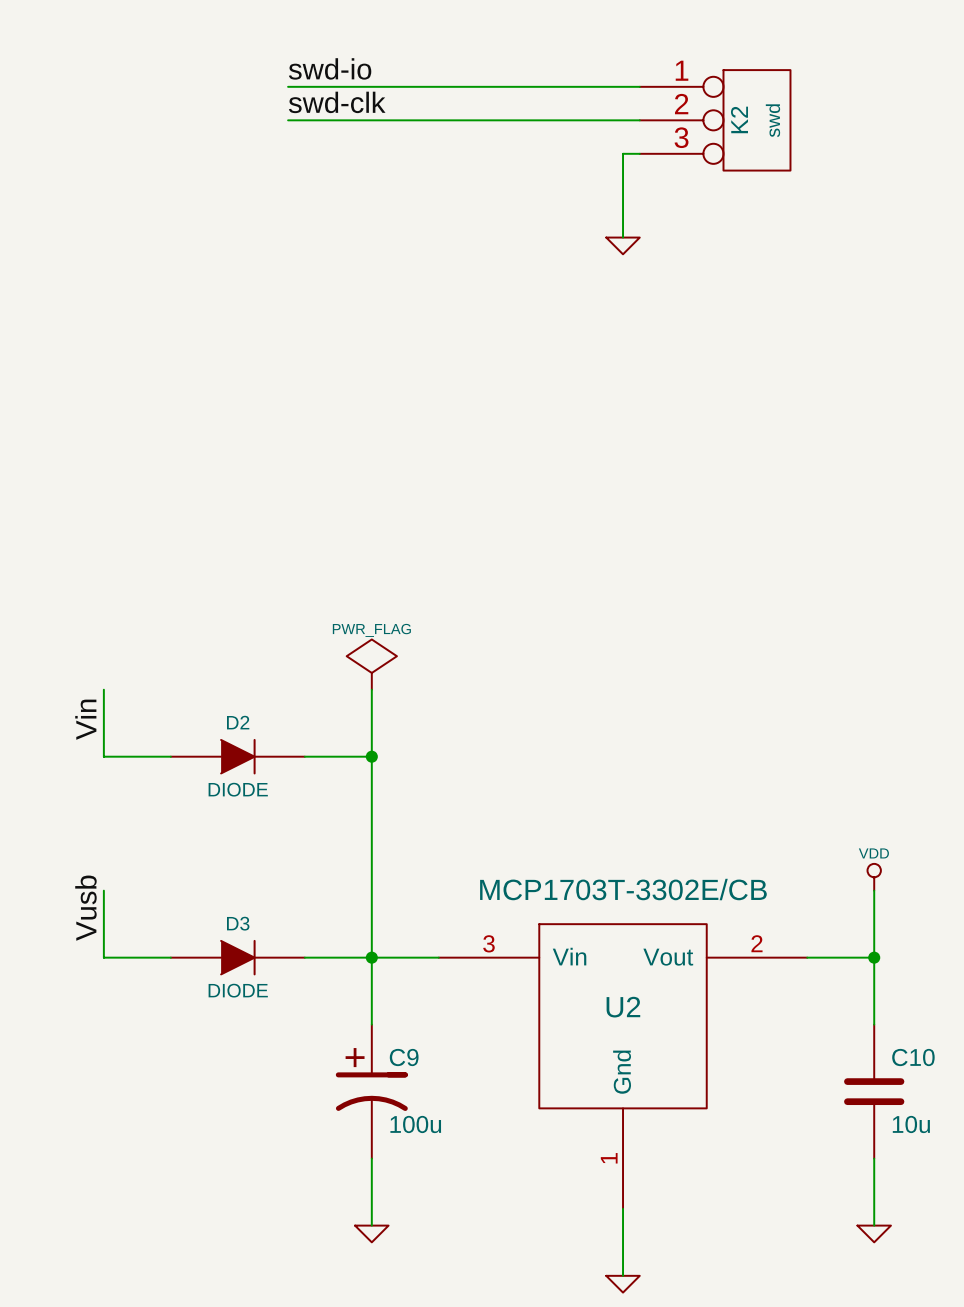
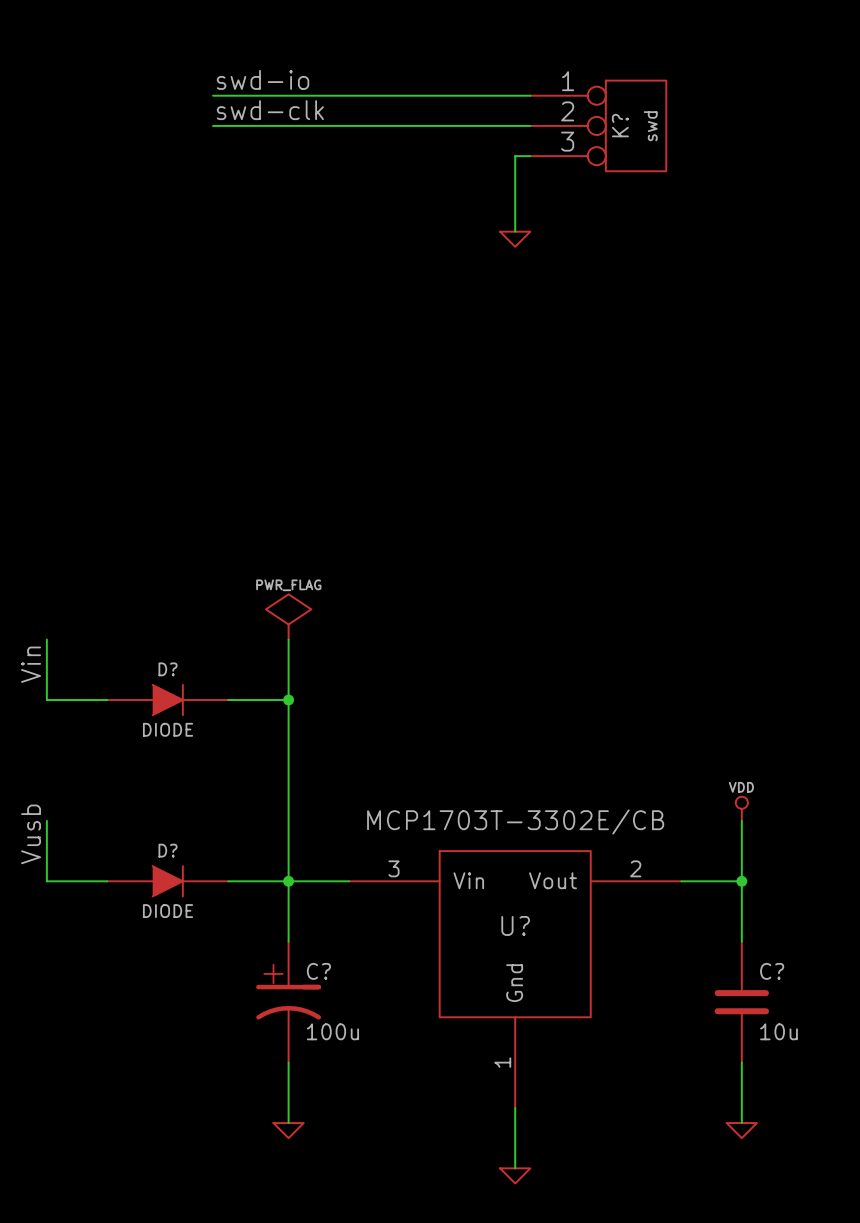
K2 name: K2 (739, 119) -> K? (620, 125)
D2 name: D2 (238, 722) -> D? (168, 669)
D3 name: D3 (238, 923) -> D? (168, 850)
U2 name: U2 (623, 1007) -> U? (515, 925)
C9 name: C9 (404, 1057) -> C? (318, 971)
C10 name: C10 (913, 1057) -> C? (772, 971)

